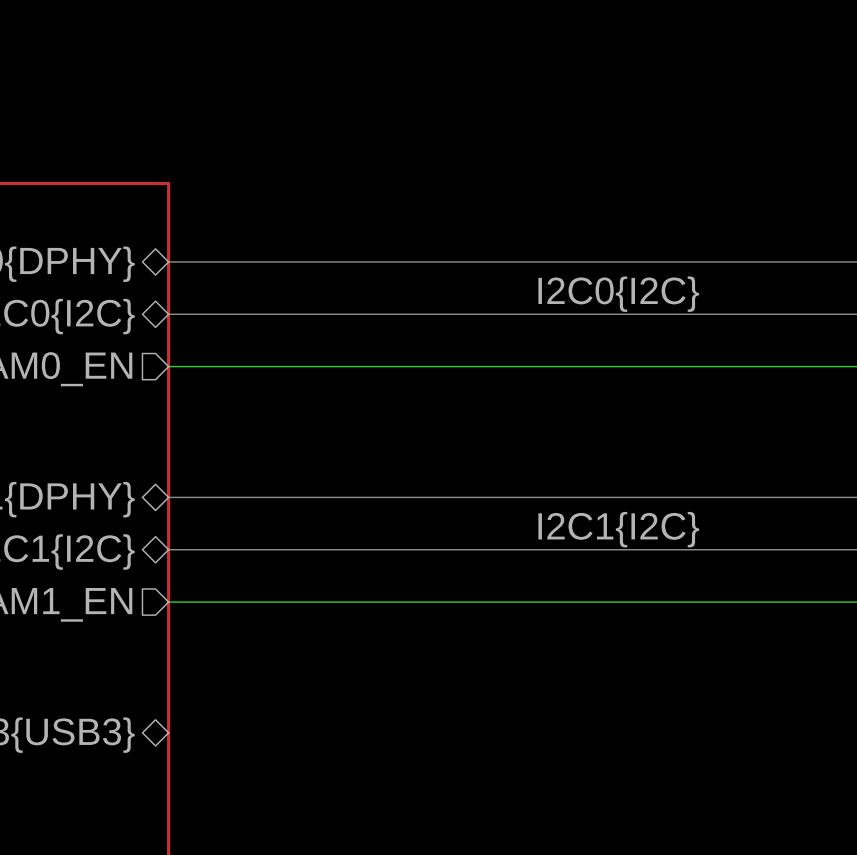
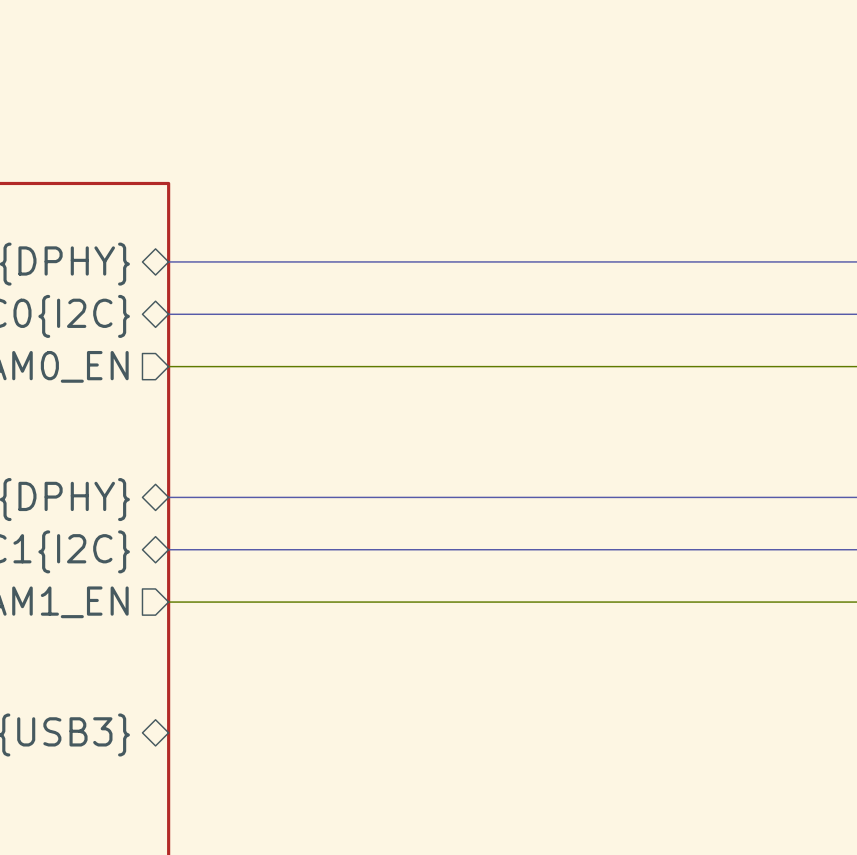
label: I2C0{I2C} (618, 294) -> none
label: I2C1{I2C} (618, 529) -> none

